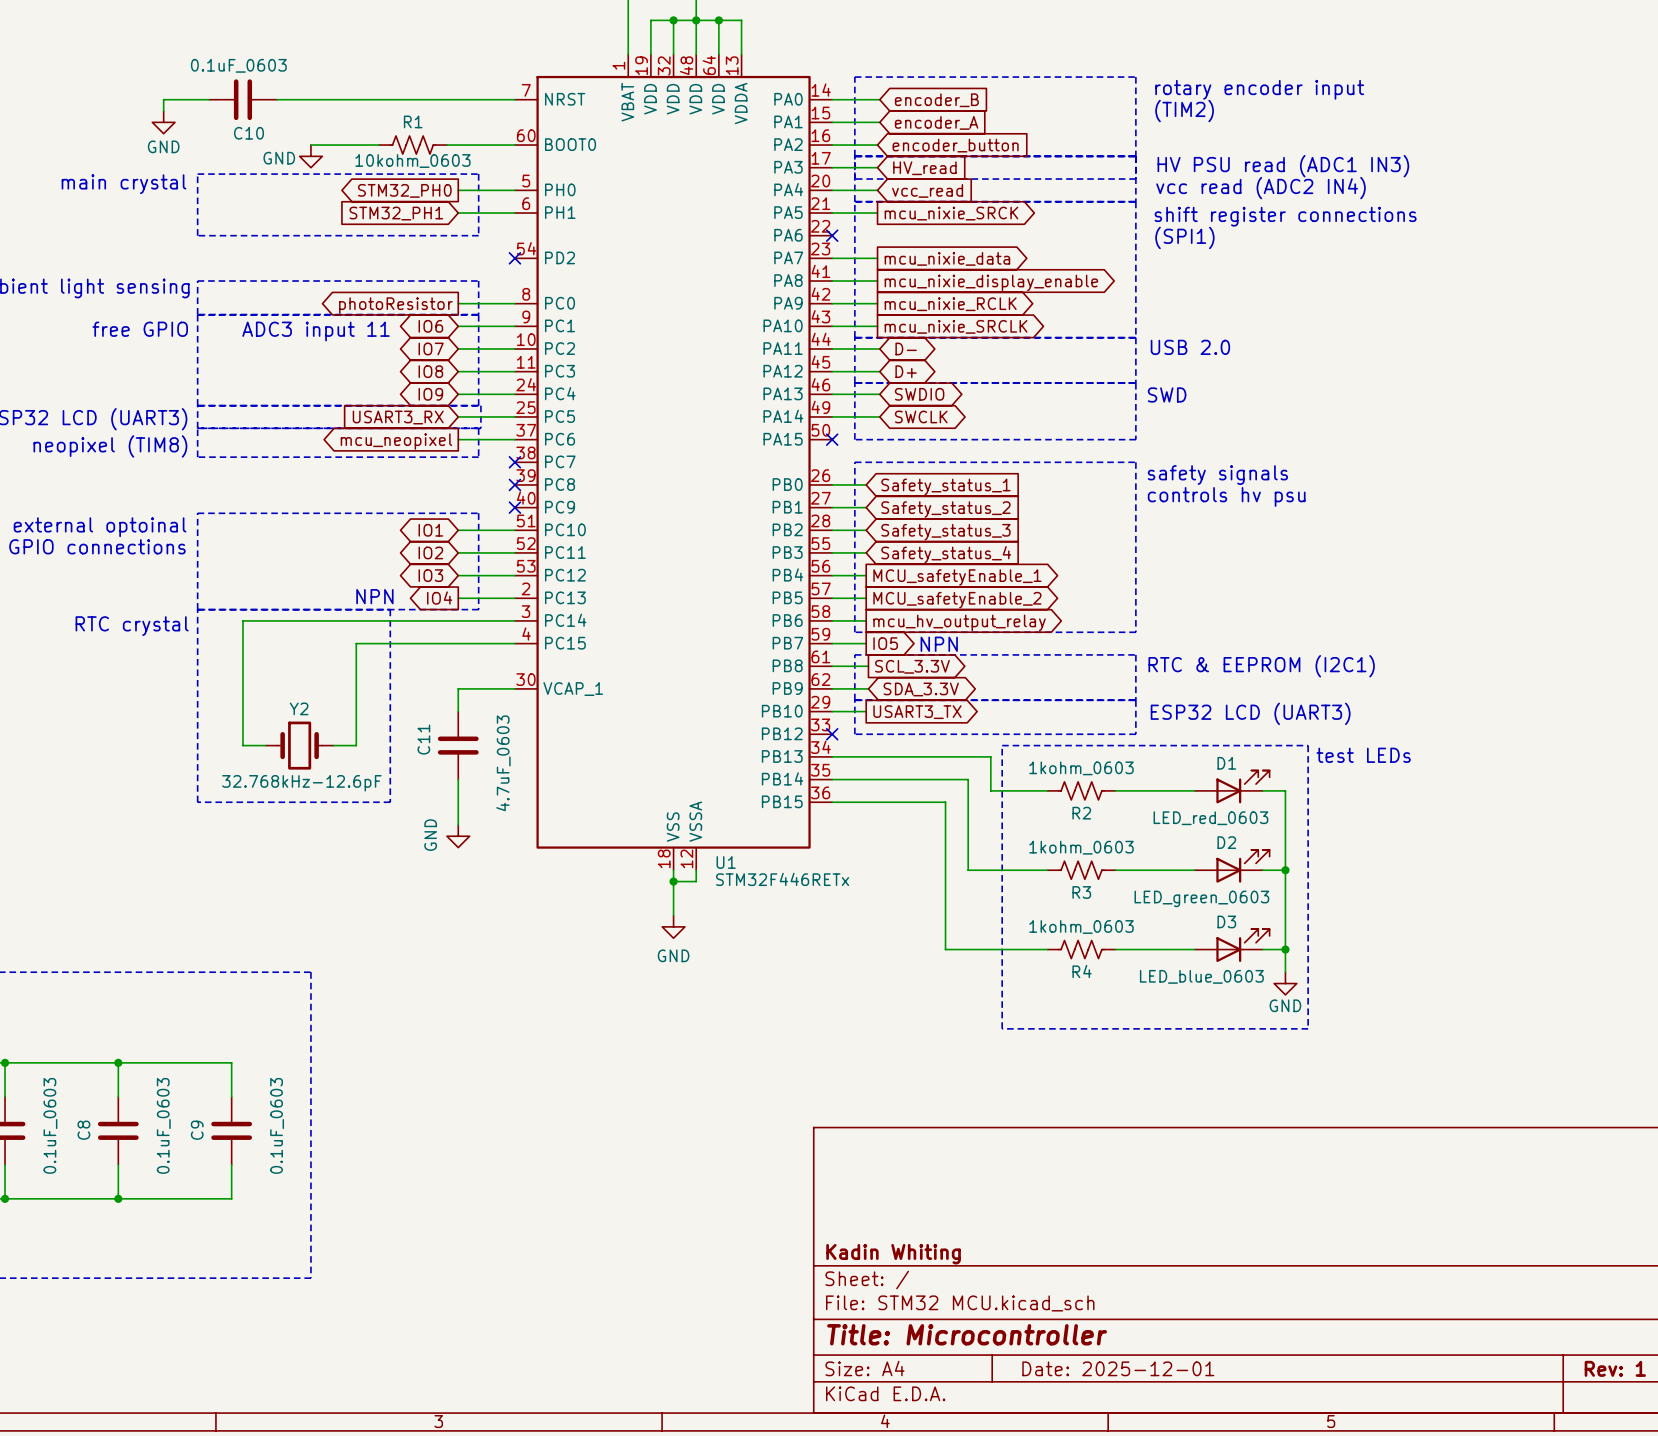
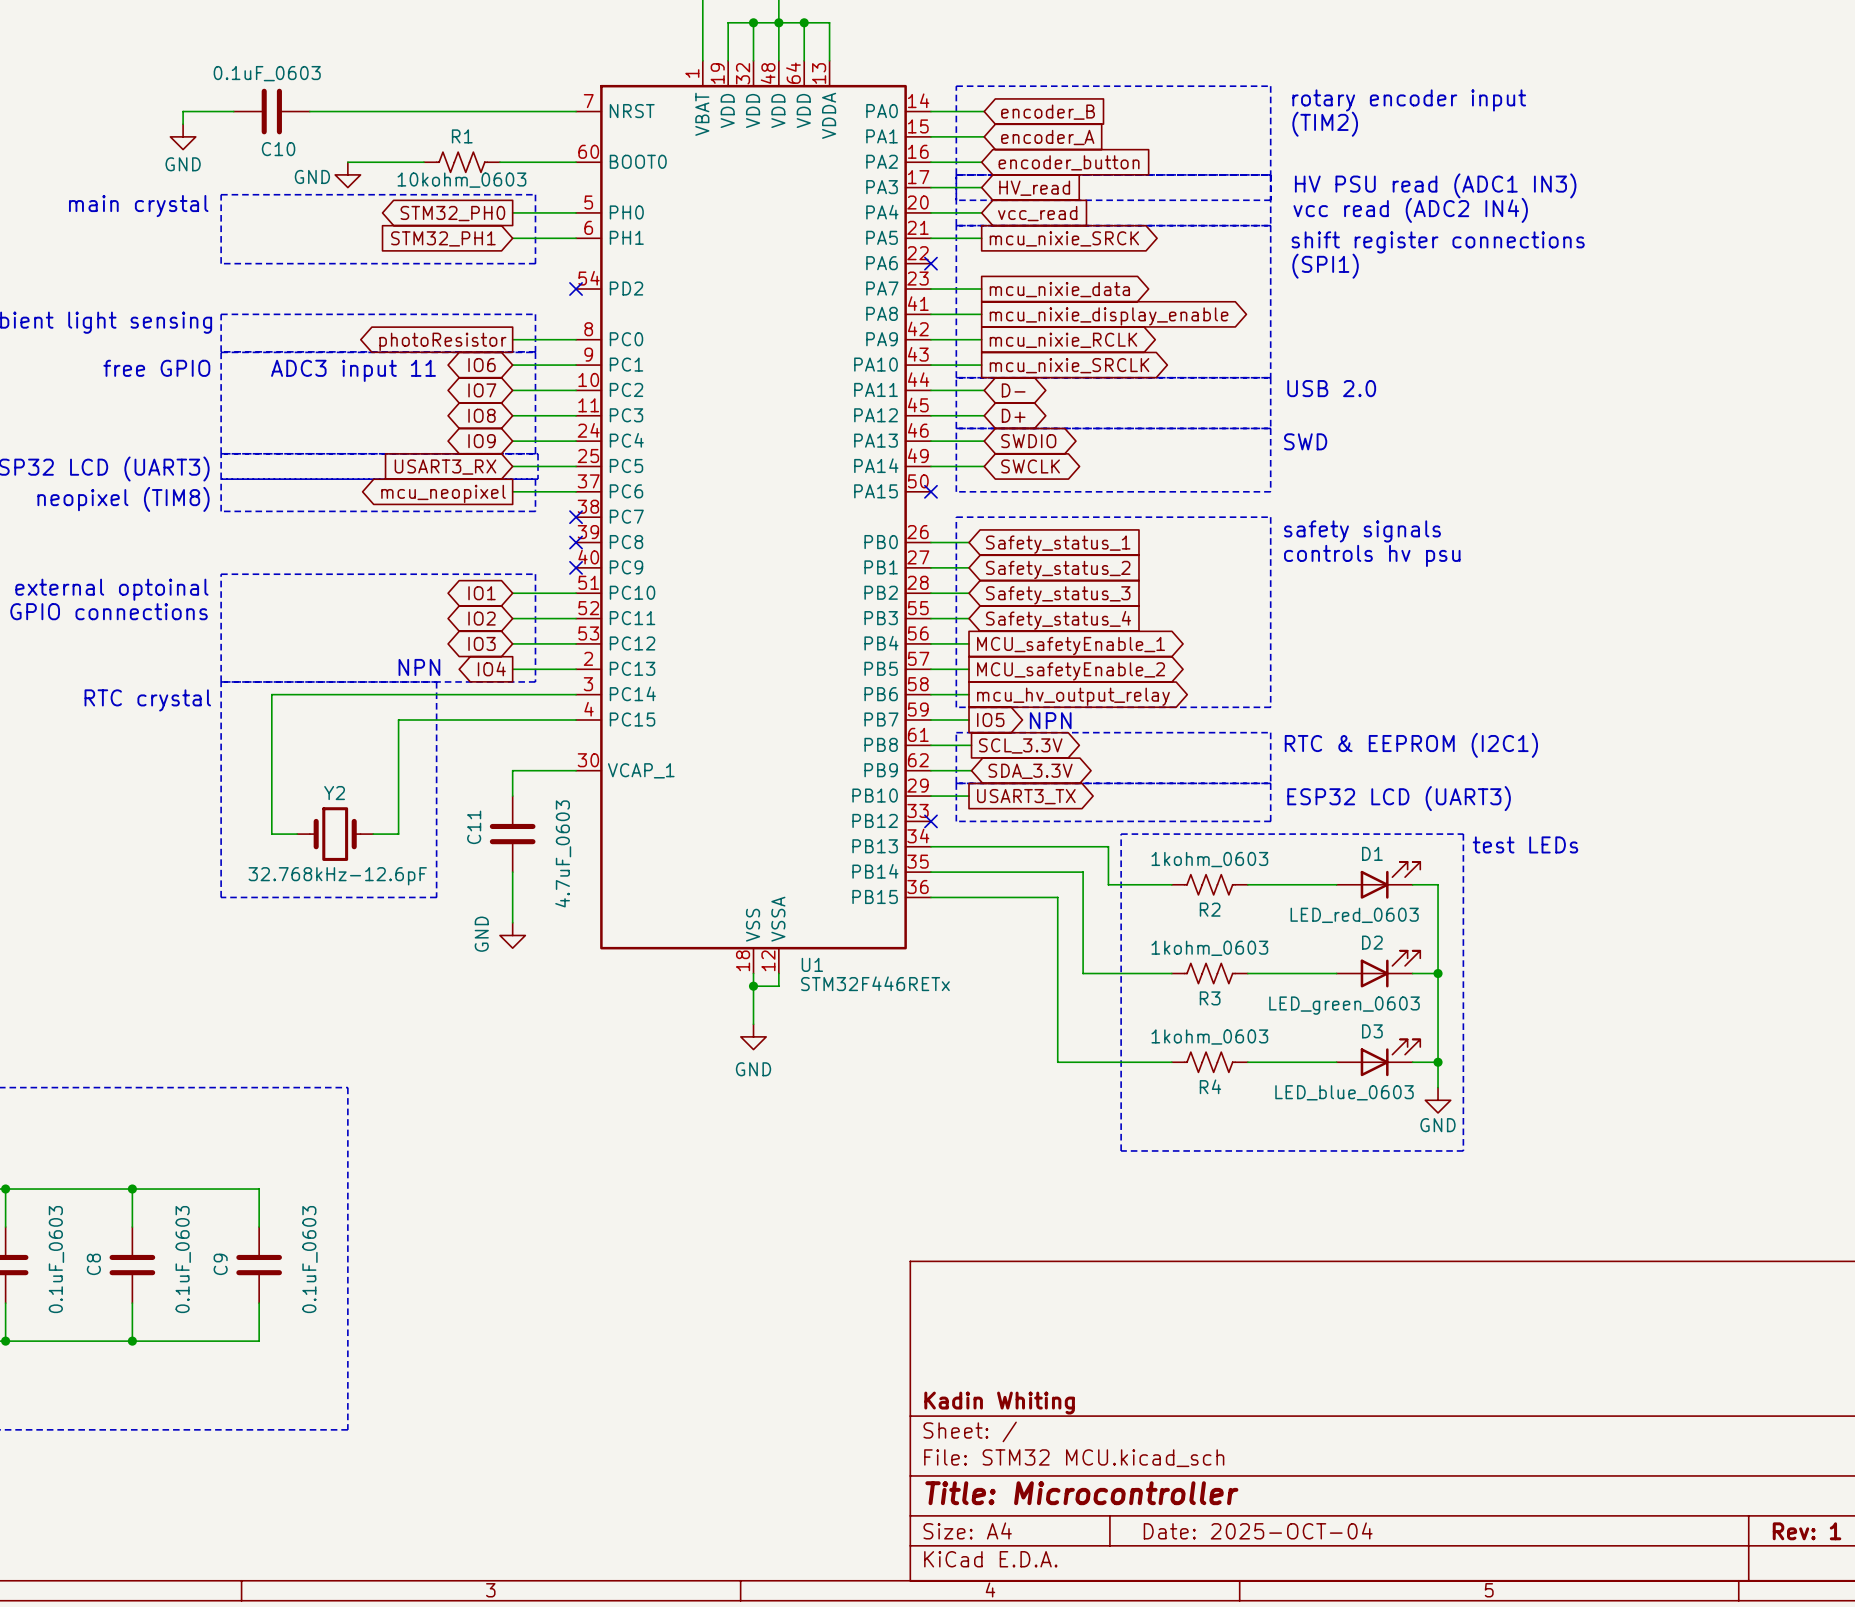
title block: Date: 2025-12-01 (1118, 1368) -> Date: 2025-OCT-04 (1258, 1530)

